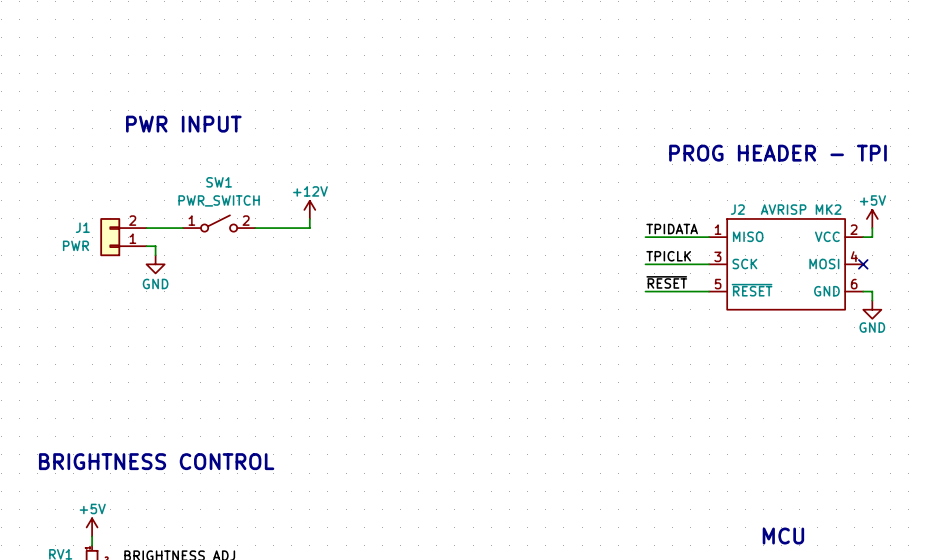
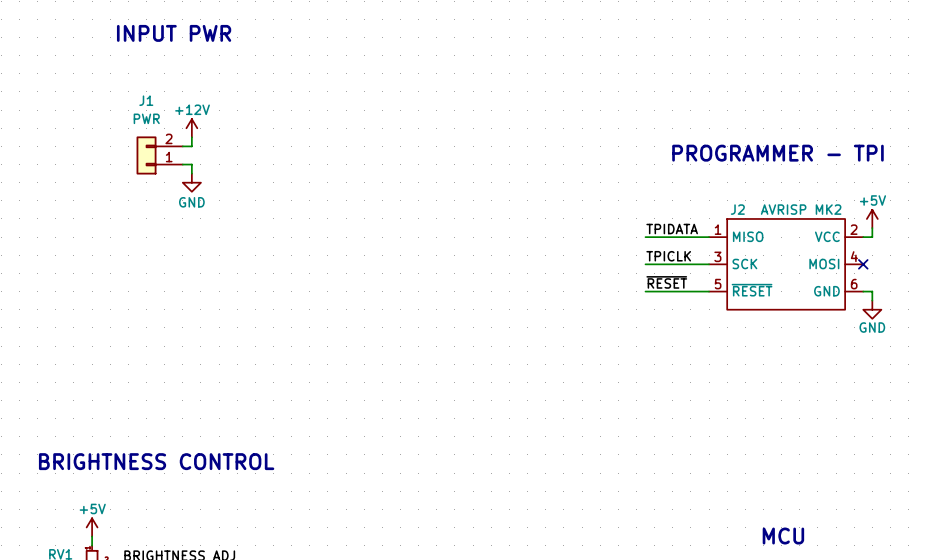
text: none -> INPUT PWR (174, 33)
text: PWR INPUT (183, 124) -> none
wire: none -> (191, 137) (191, 146) (182, 146)
text: PROG HEADER - TPI (777, 153) -> PROGRAMMER - TPI (777, 153)
power symbol position: +12V (309, 209) -> +12V (191, 128)
wire: (309, 218) (309, 228) (255, 228) -> none
SW1: PWR_SWITCH (219, 223) -> none
J1 name position: J1 (82, 227) -> J1 (146, 100)
wire: (146, 228) (182, 228) -> none
J1 position: (123, 237) -> (159, 155)
J1 value position: PWR (75, 245) -> PWR (146, 118)
wire: (146, 246) (155, 246) (155, 255) -> (182, 164) (191, 164) (191, 173)
power symbol position: GND (155, 264) -> GND (191, 182)

